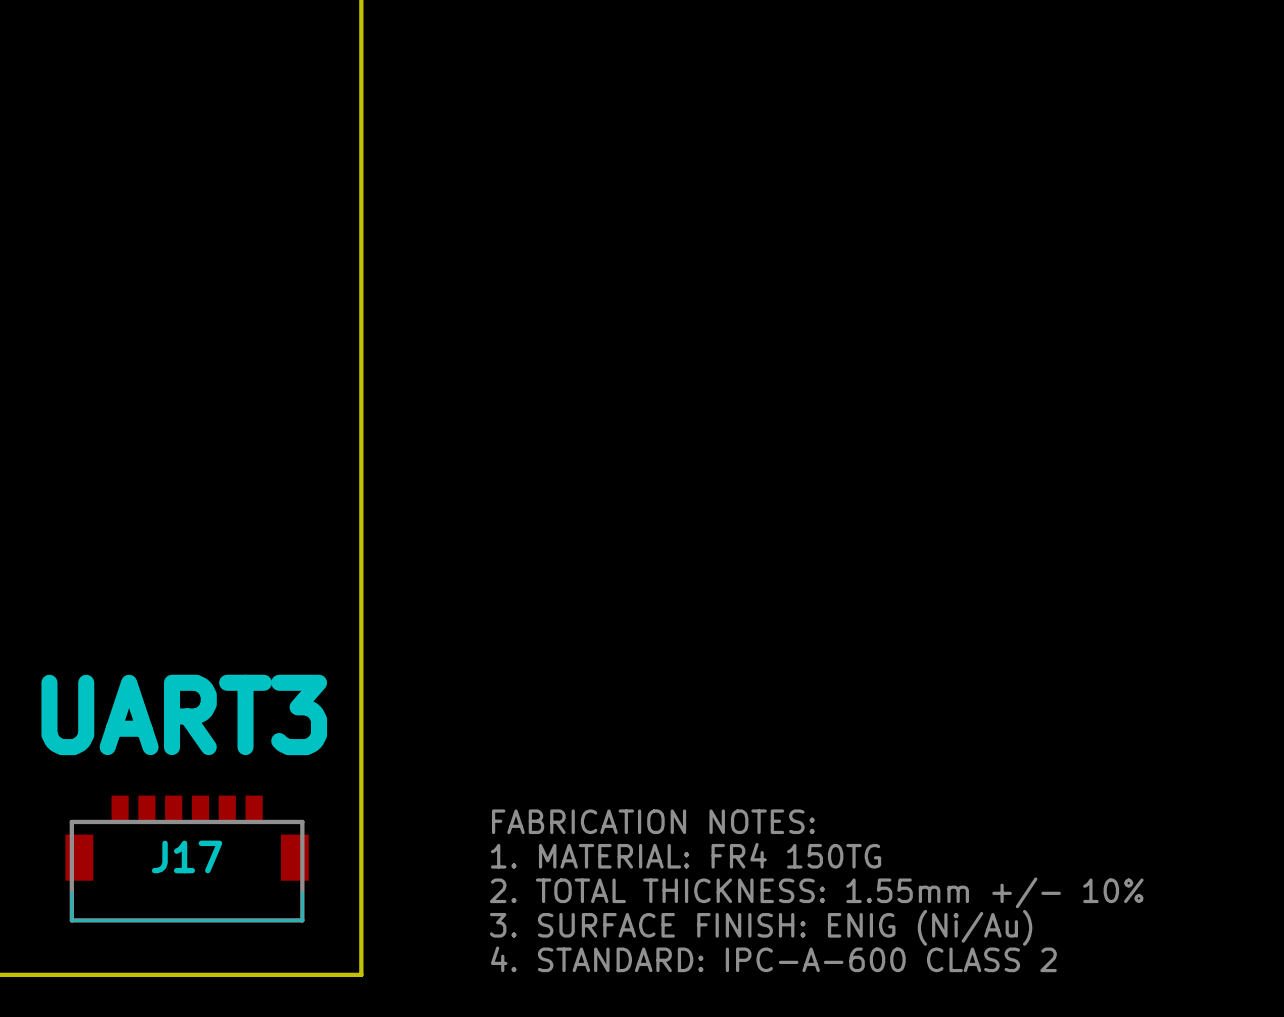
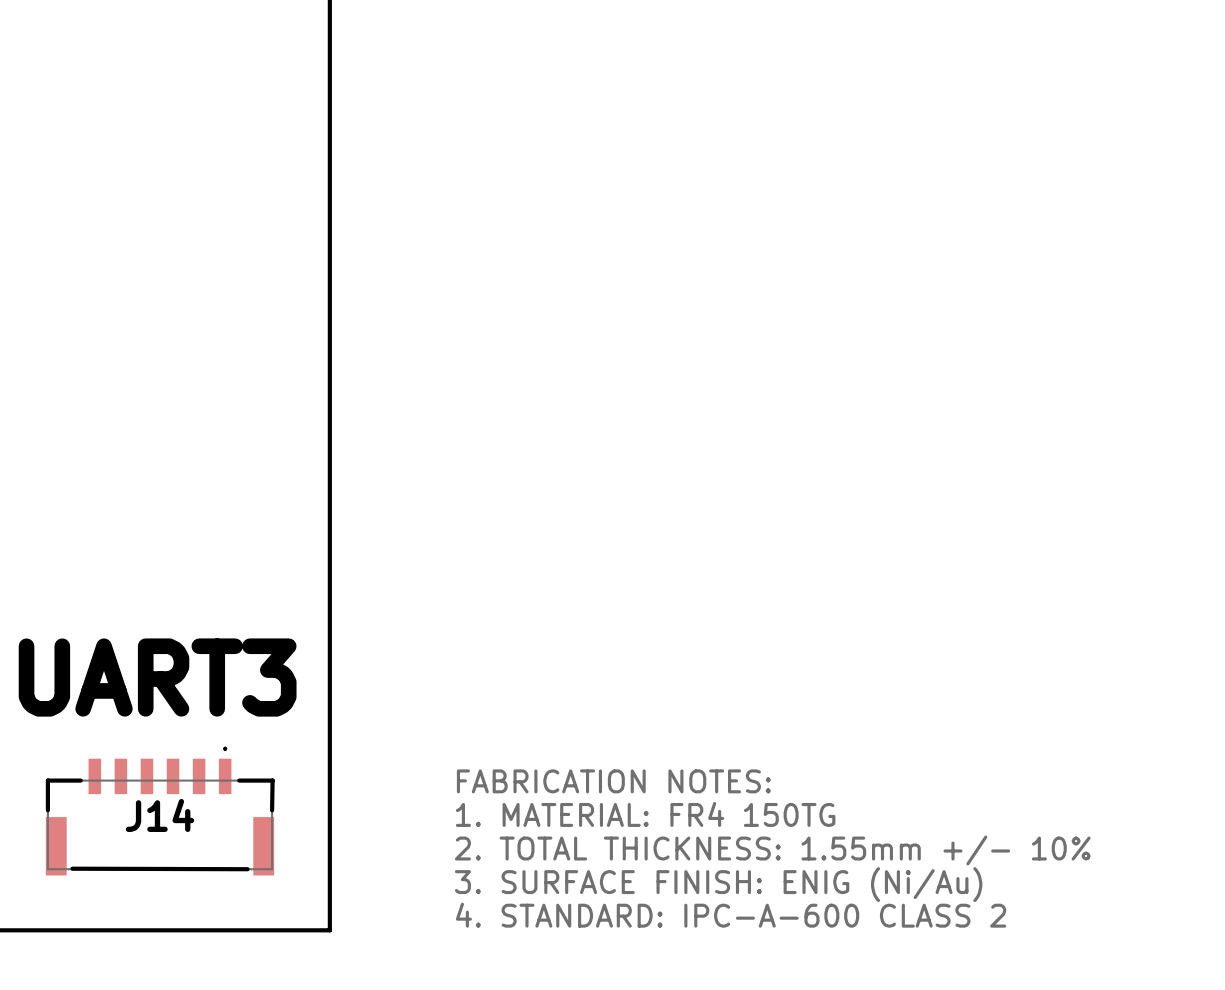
J14: none -> (160, 811)
J17: (187, 859) -> none

